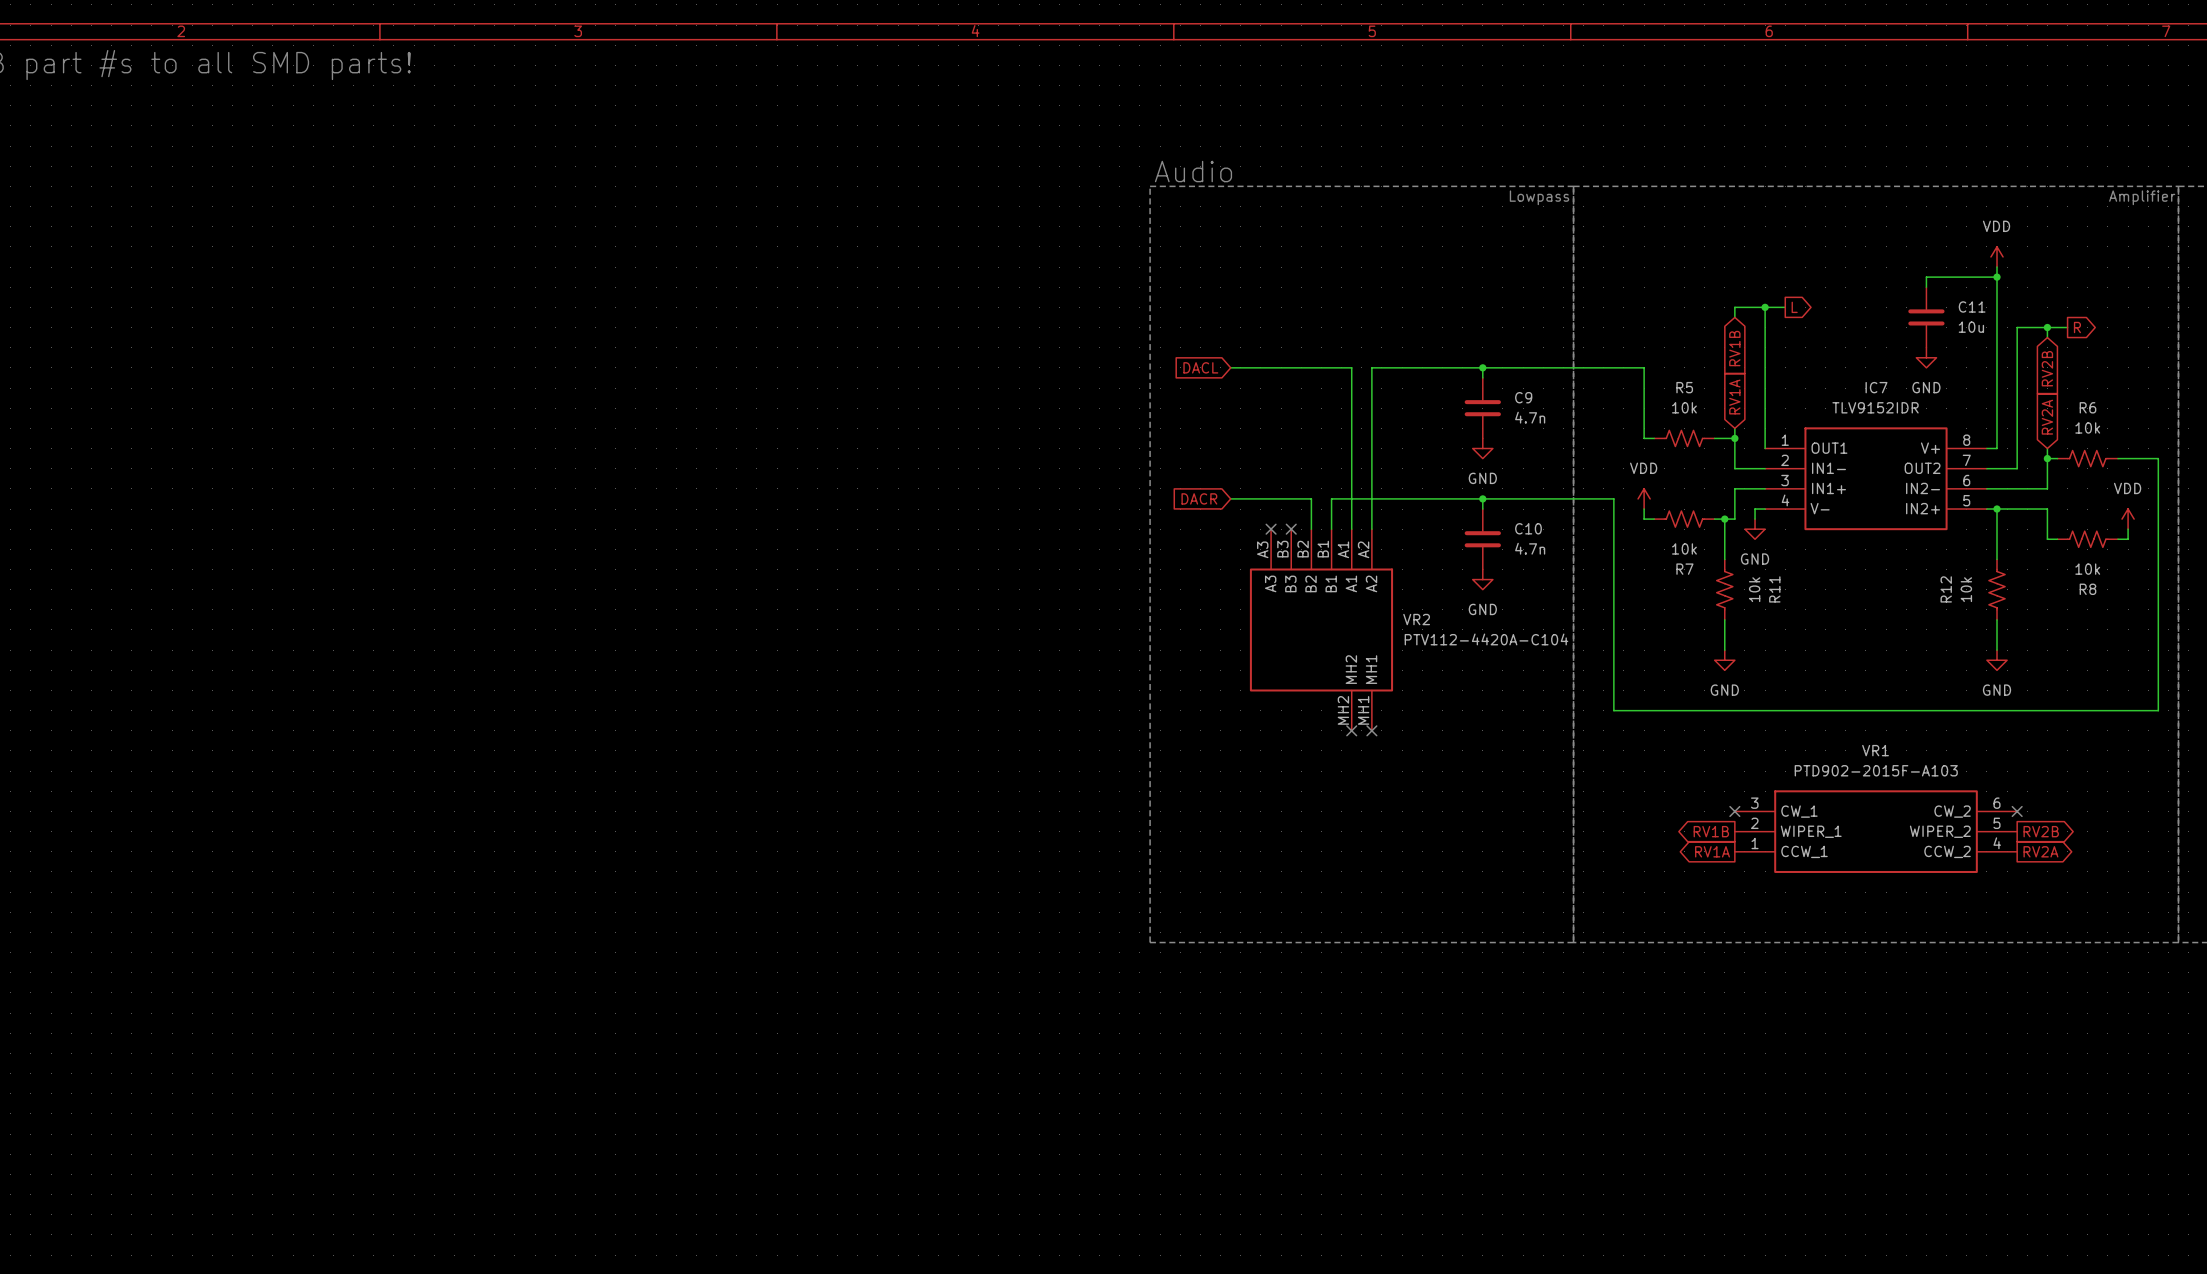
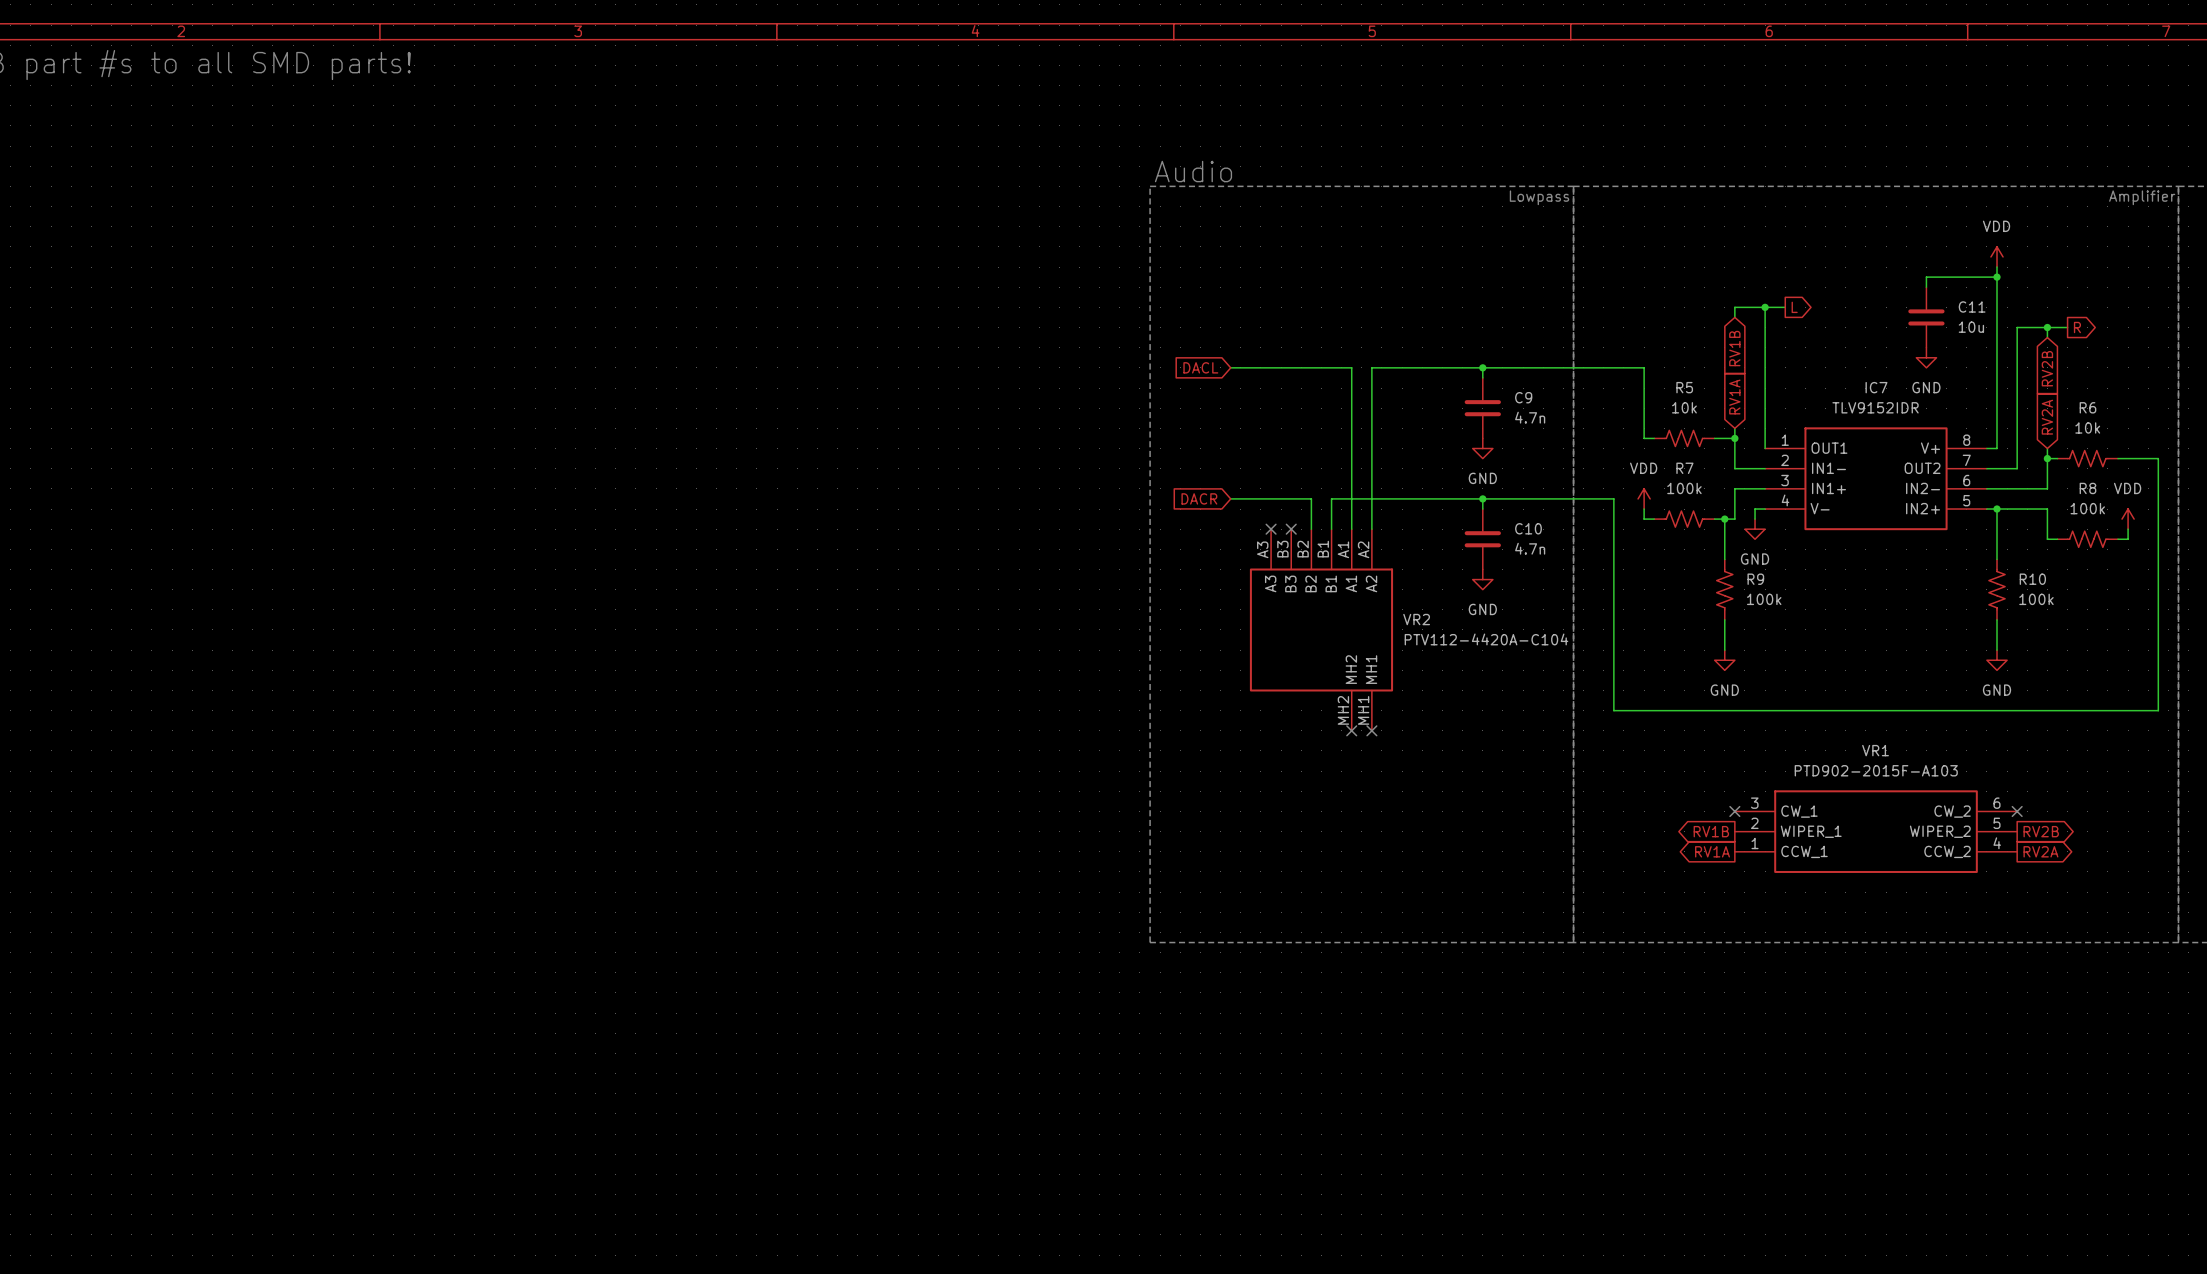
R7 value: 10k (1684, 548) -> 100k (1684, 488)
R7 name position: R7 (1684, 569) -> R7 (1684, 468)
R8 value: 10k (2087, 569) -> 100k (2087, 508)
R11 value: 10k (1754, 589) -> 100k (1764, 599)
R11 name: R11 (1774, 589) -> R9 (1755, 579)
R12 name: R12 (1946, 589) -> R10 (2032, 579)
R12 value: 10k (1966, 589) -> 100k (2036, 599)
R8 name position: R8 (2087, 589) -> R8 (2087, 488)

